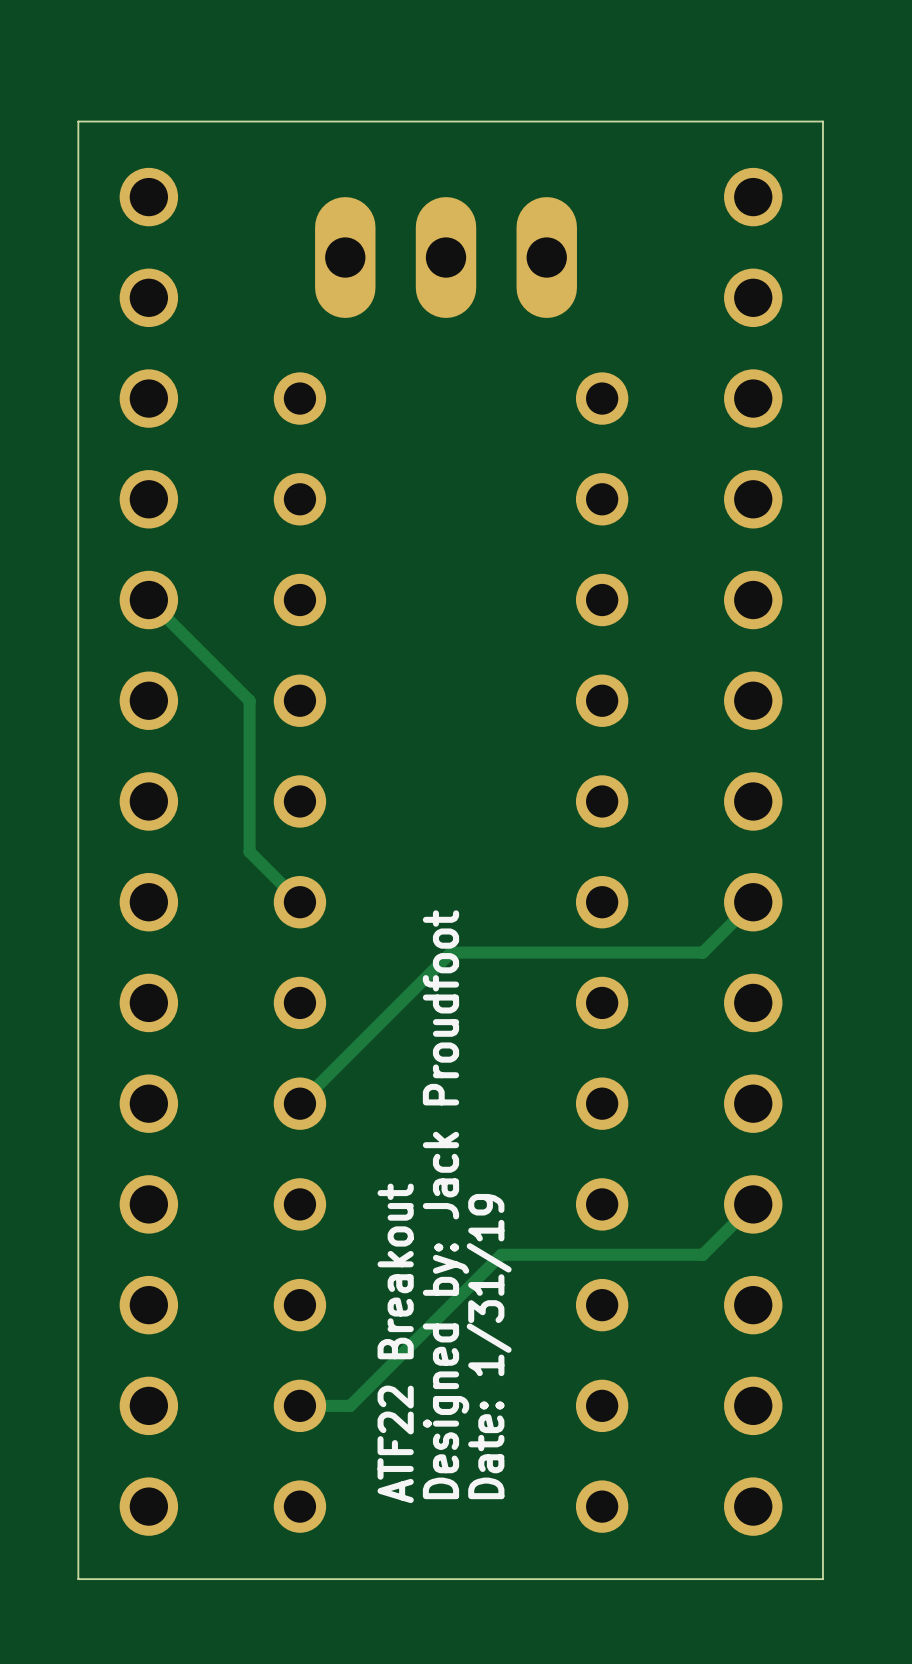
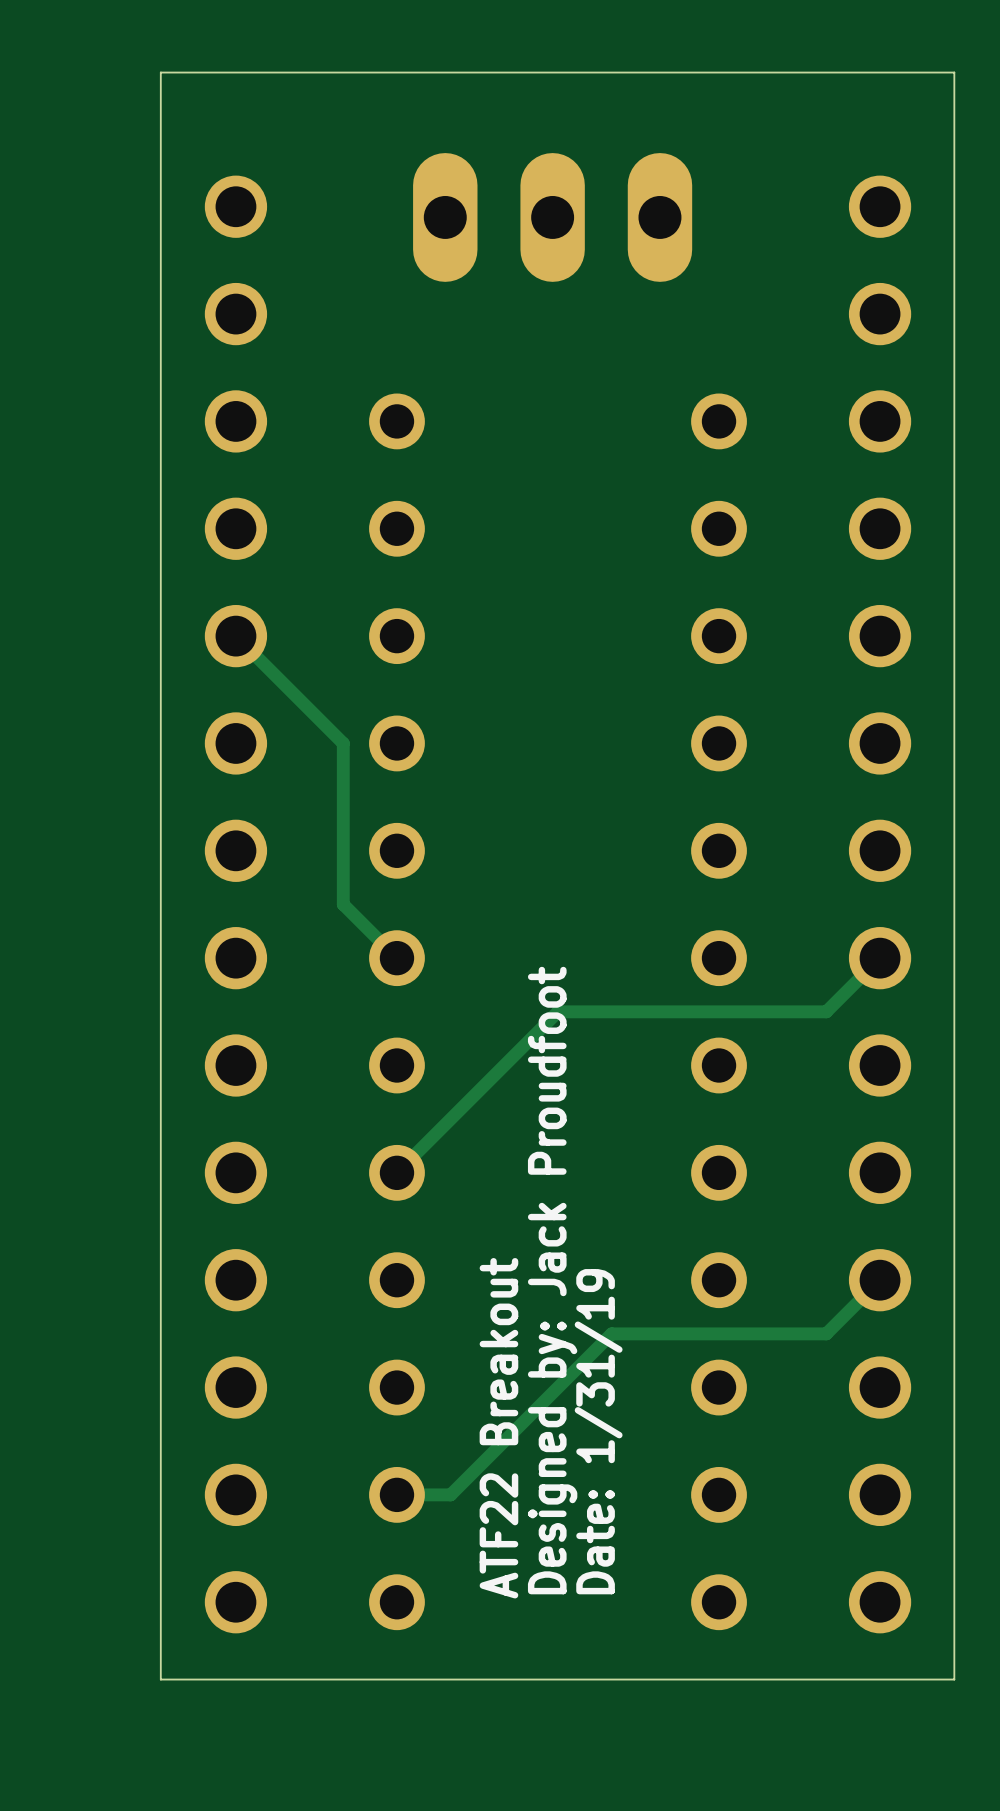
board edge: (822, 121) (78, 121) -> (954, 126) (954, 72) (160, 72) (160, 126)
part position: (446, 257) -> (552, 217)

